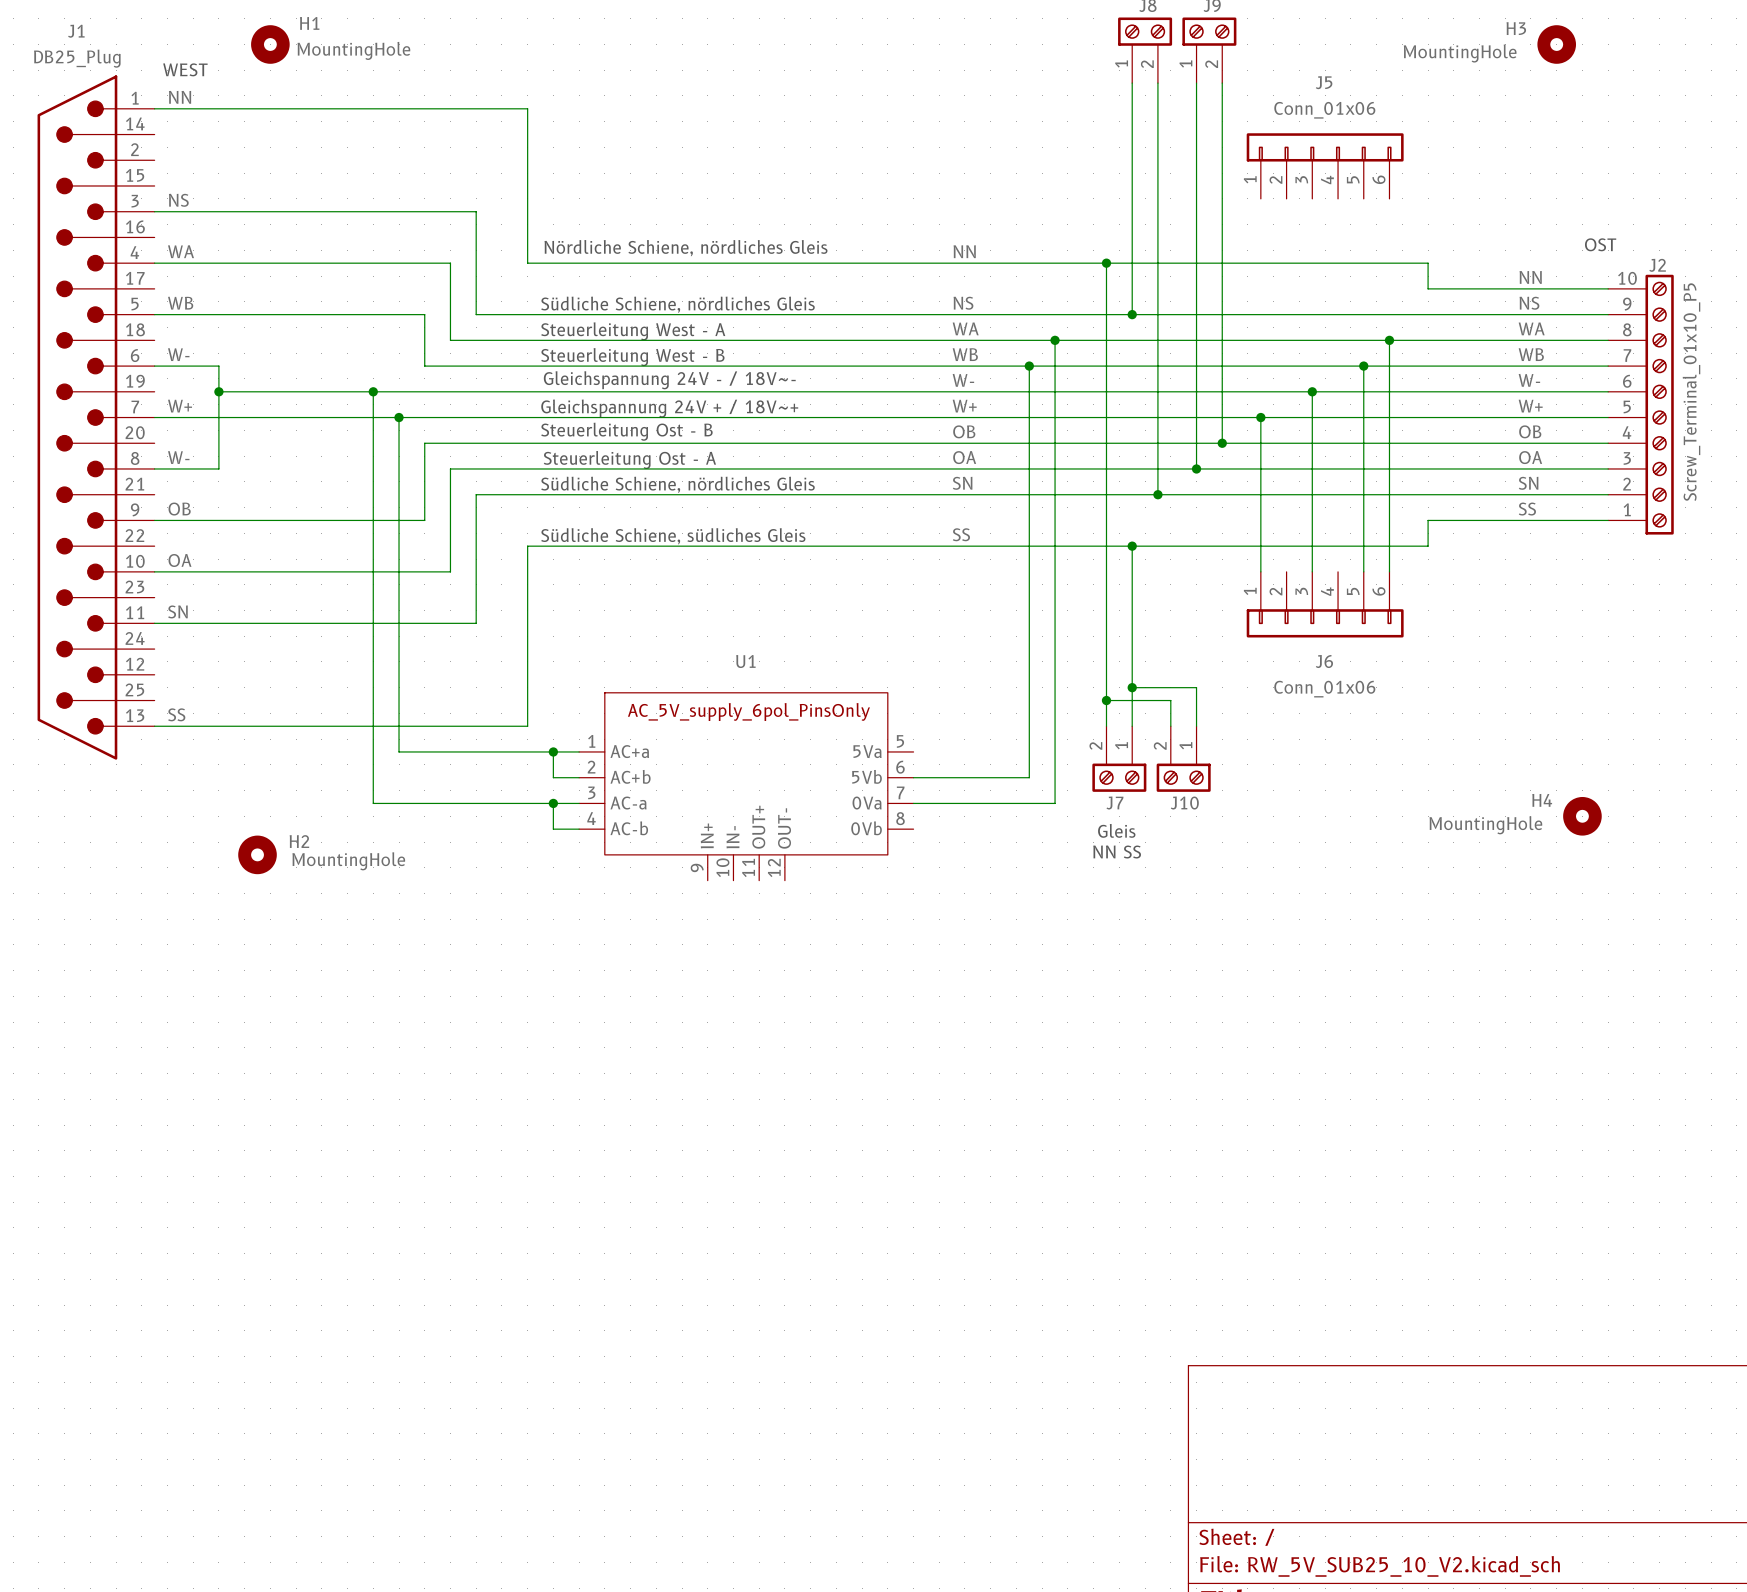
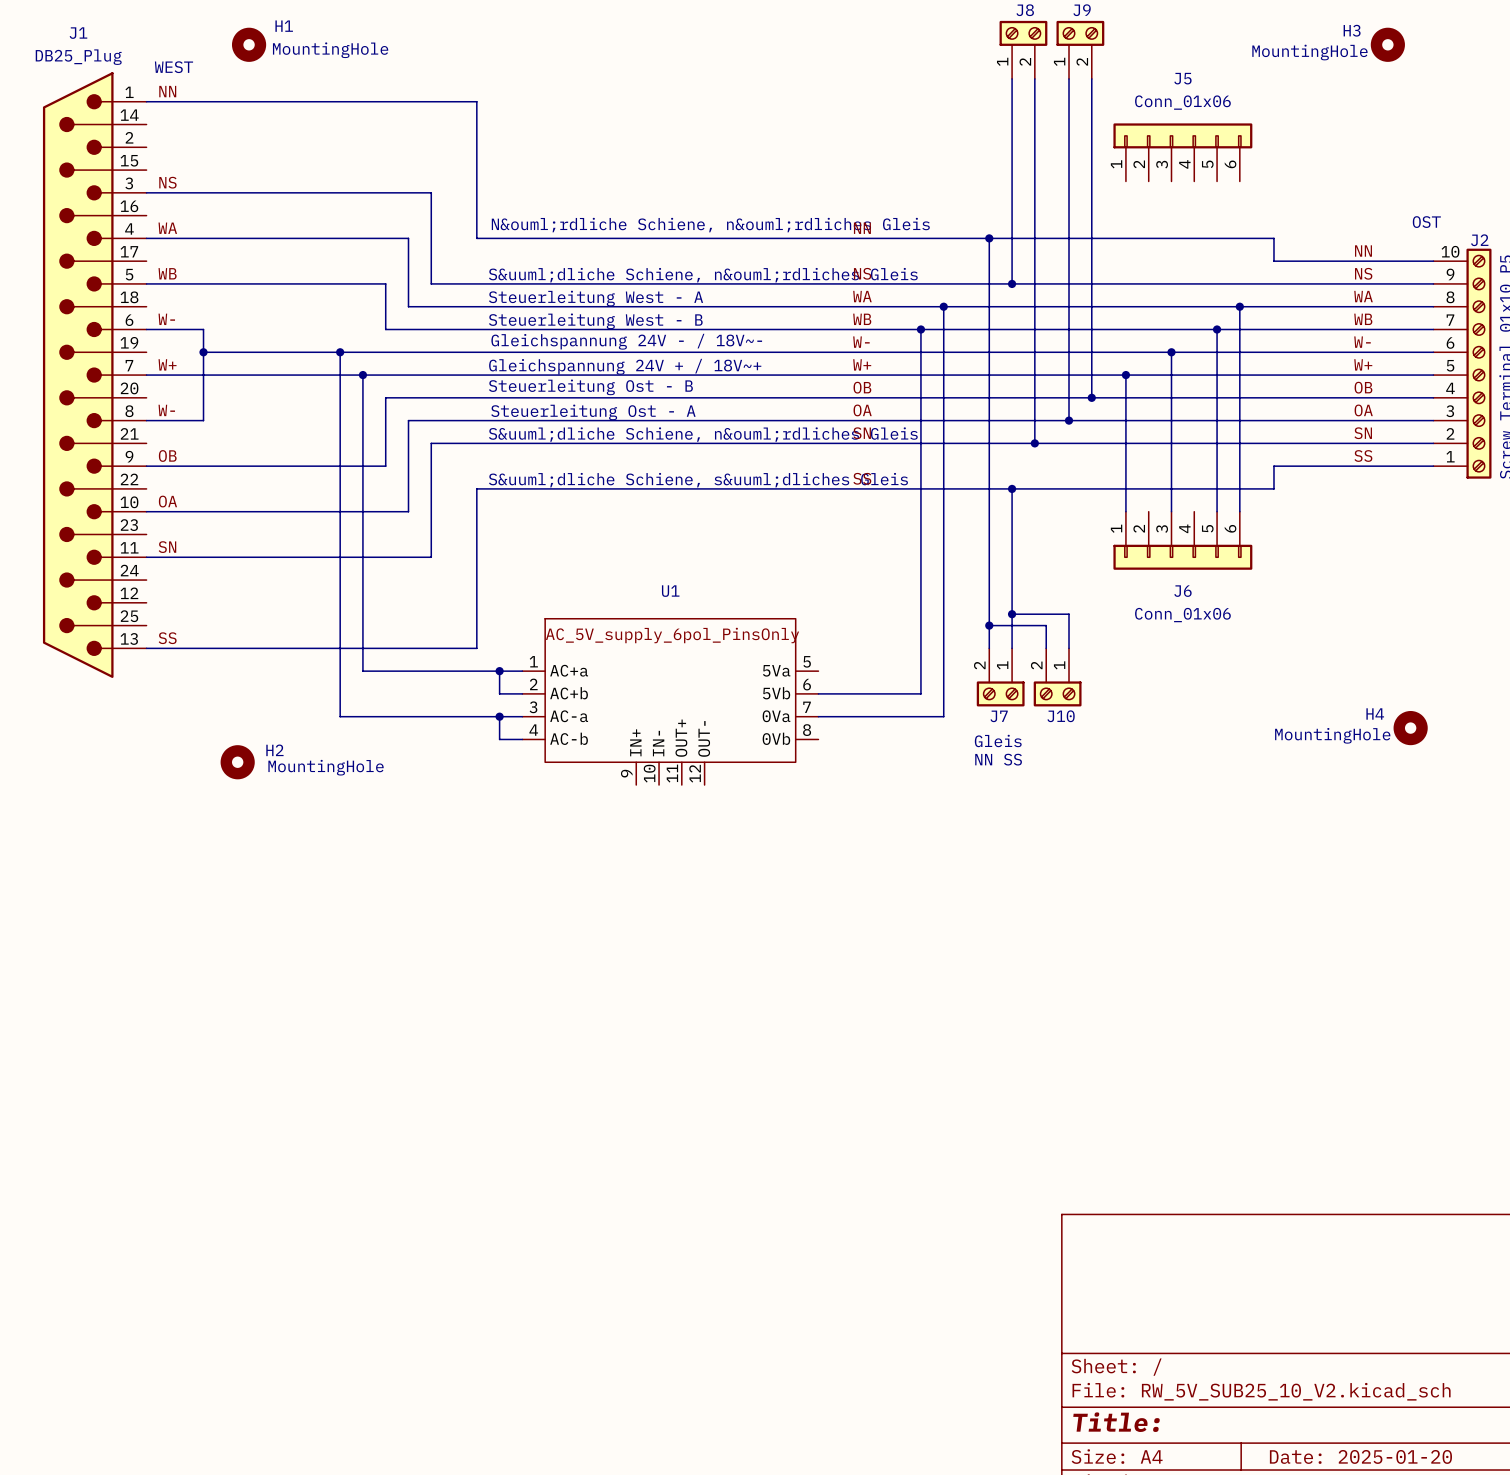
text: Nördliche Schiene, nördliches Gleis (685, 248) -> N&ouml;rdliche Schiene, n&ouml;rdliches Gleis (710, 225)
text: Südliche Schiene, nördliches Gleis (677, 304) -> S&uuml;dliche Schiene, n&ouml;rdliches Gleis (703, 275)
text: Südliche Schiene, nördliches Gleis (677, 484) -> S&uuml;dliche Schiene, n&ouml;rdliches Gleis (703, 434)
text: Südliche Schiene, südliches Gleis (673, 536) -> S&uuml;dliche Schiene, s&uuml;dliches Gleis (698, 480)

